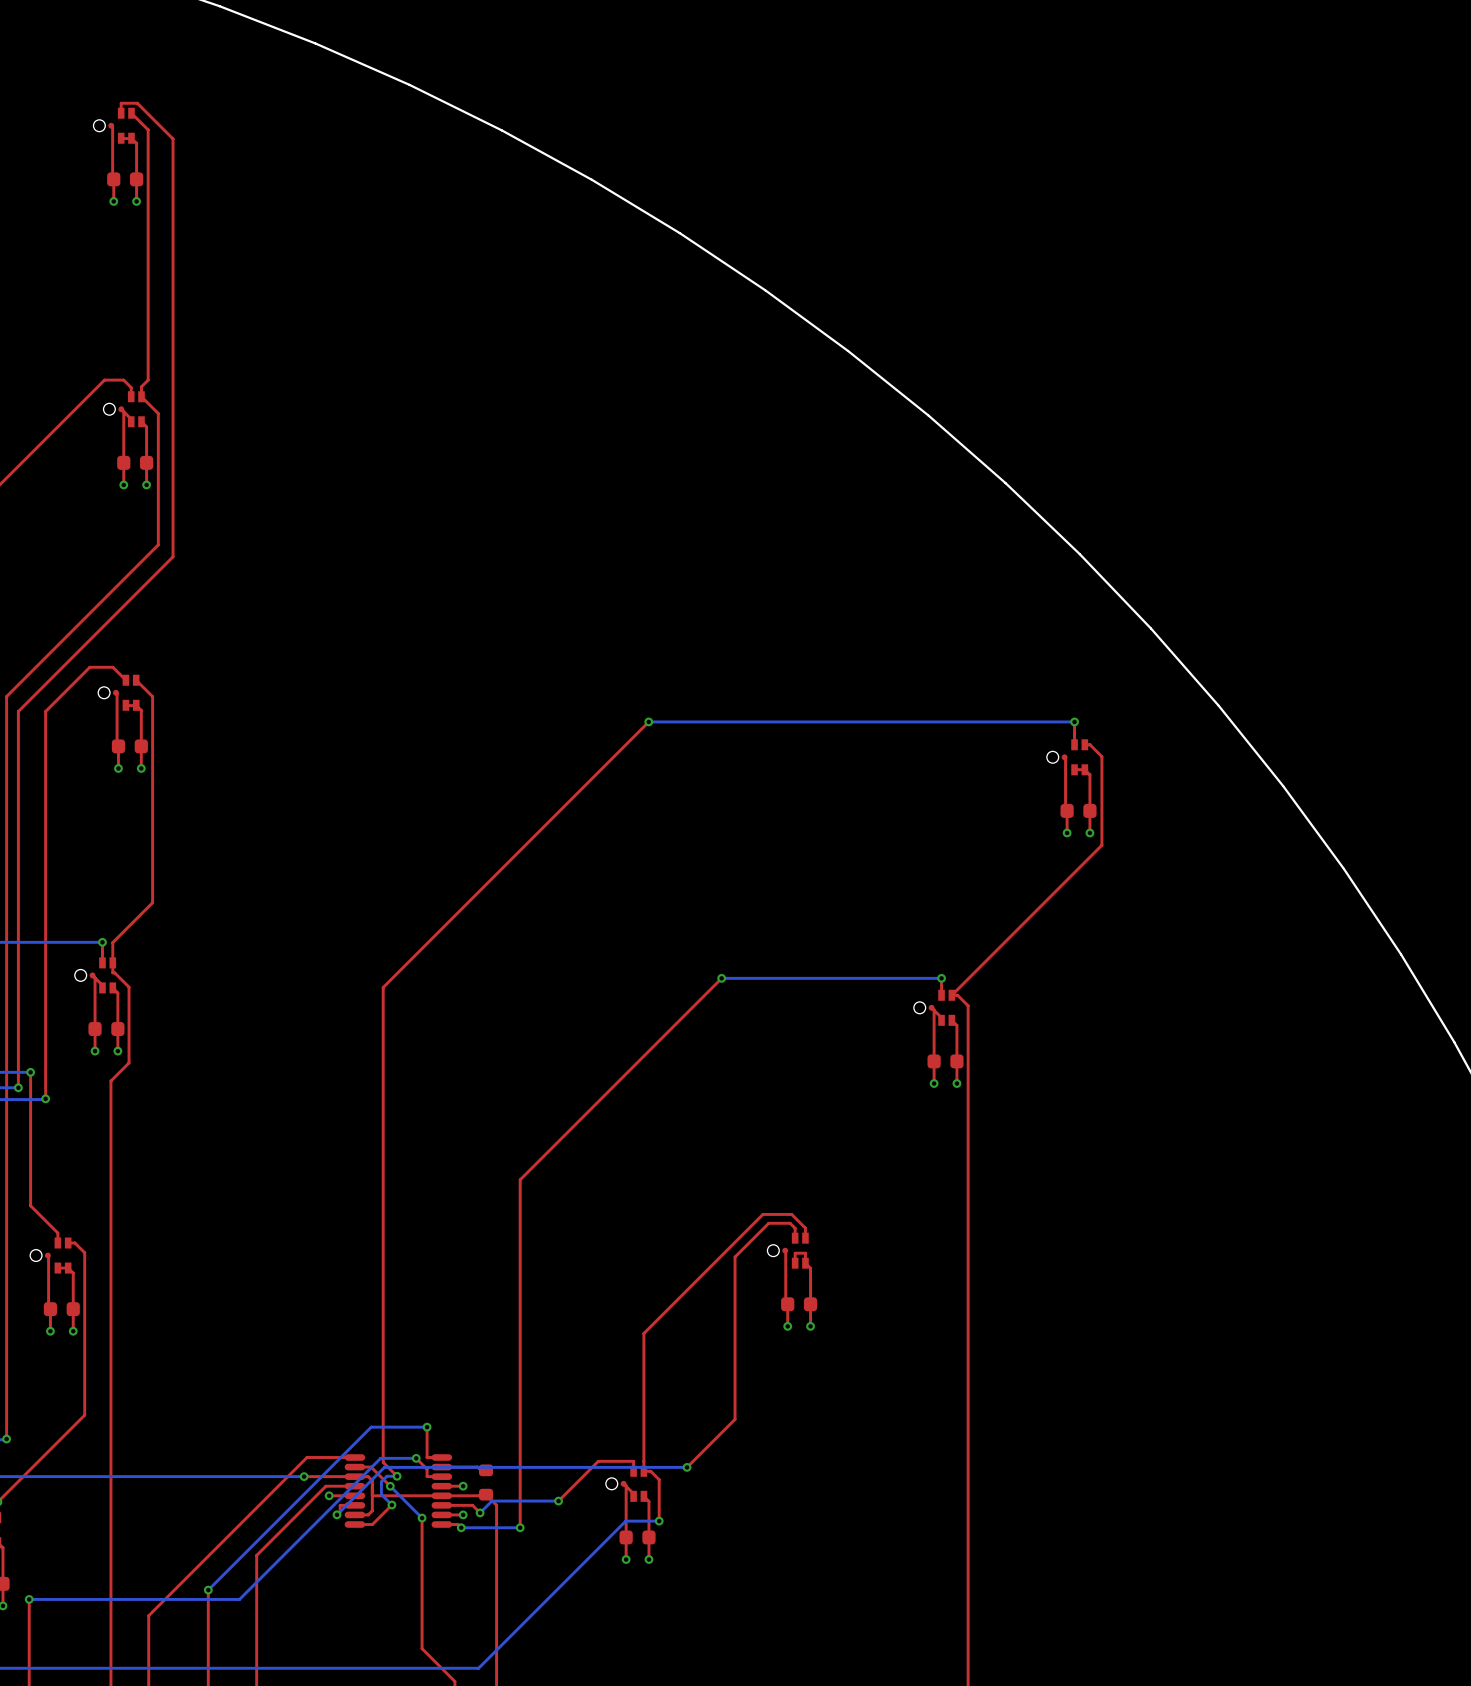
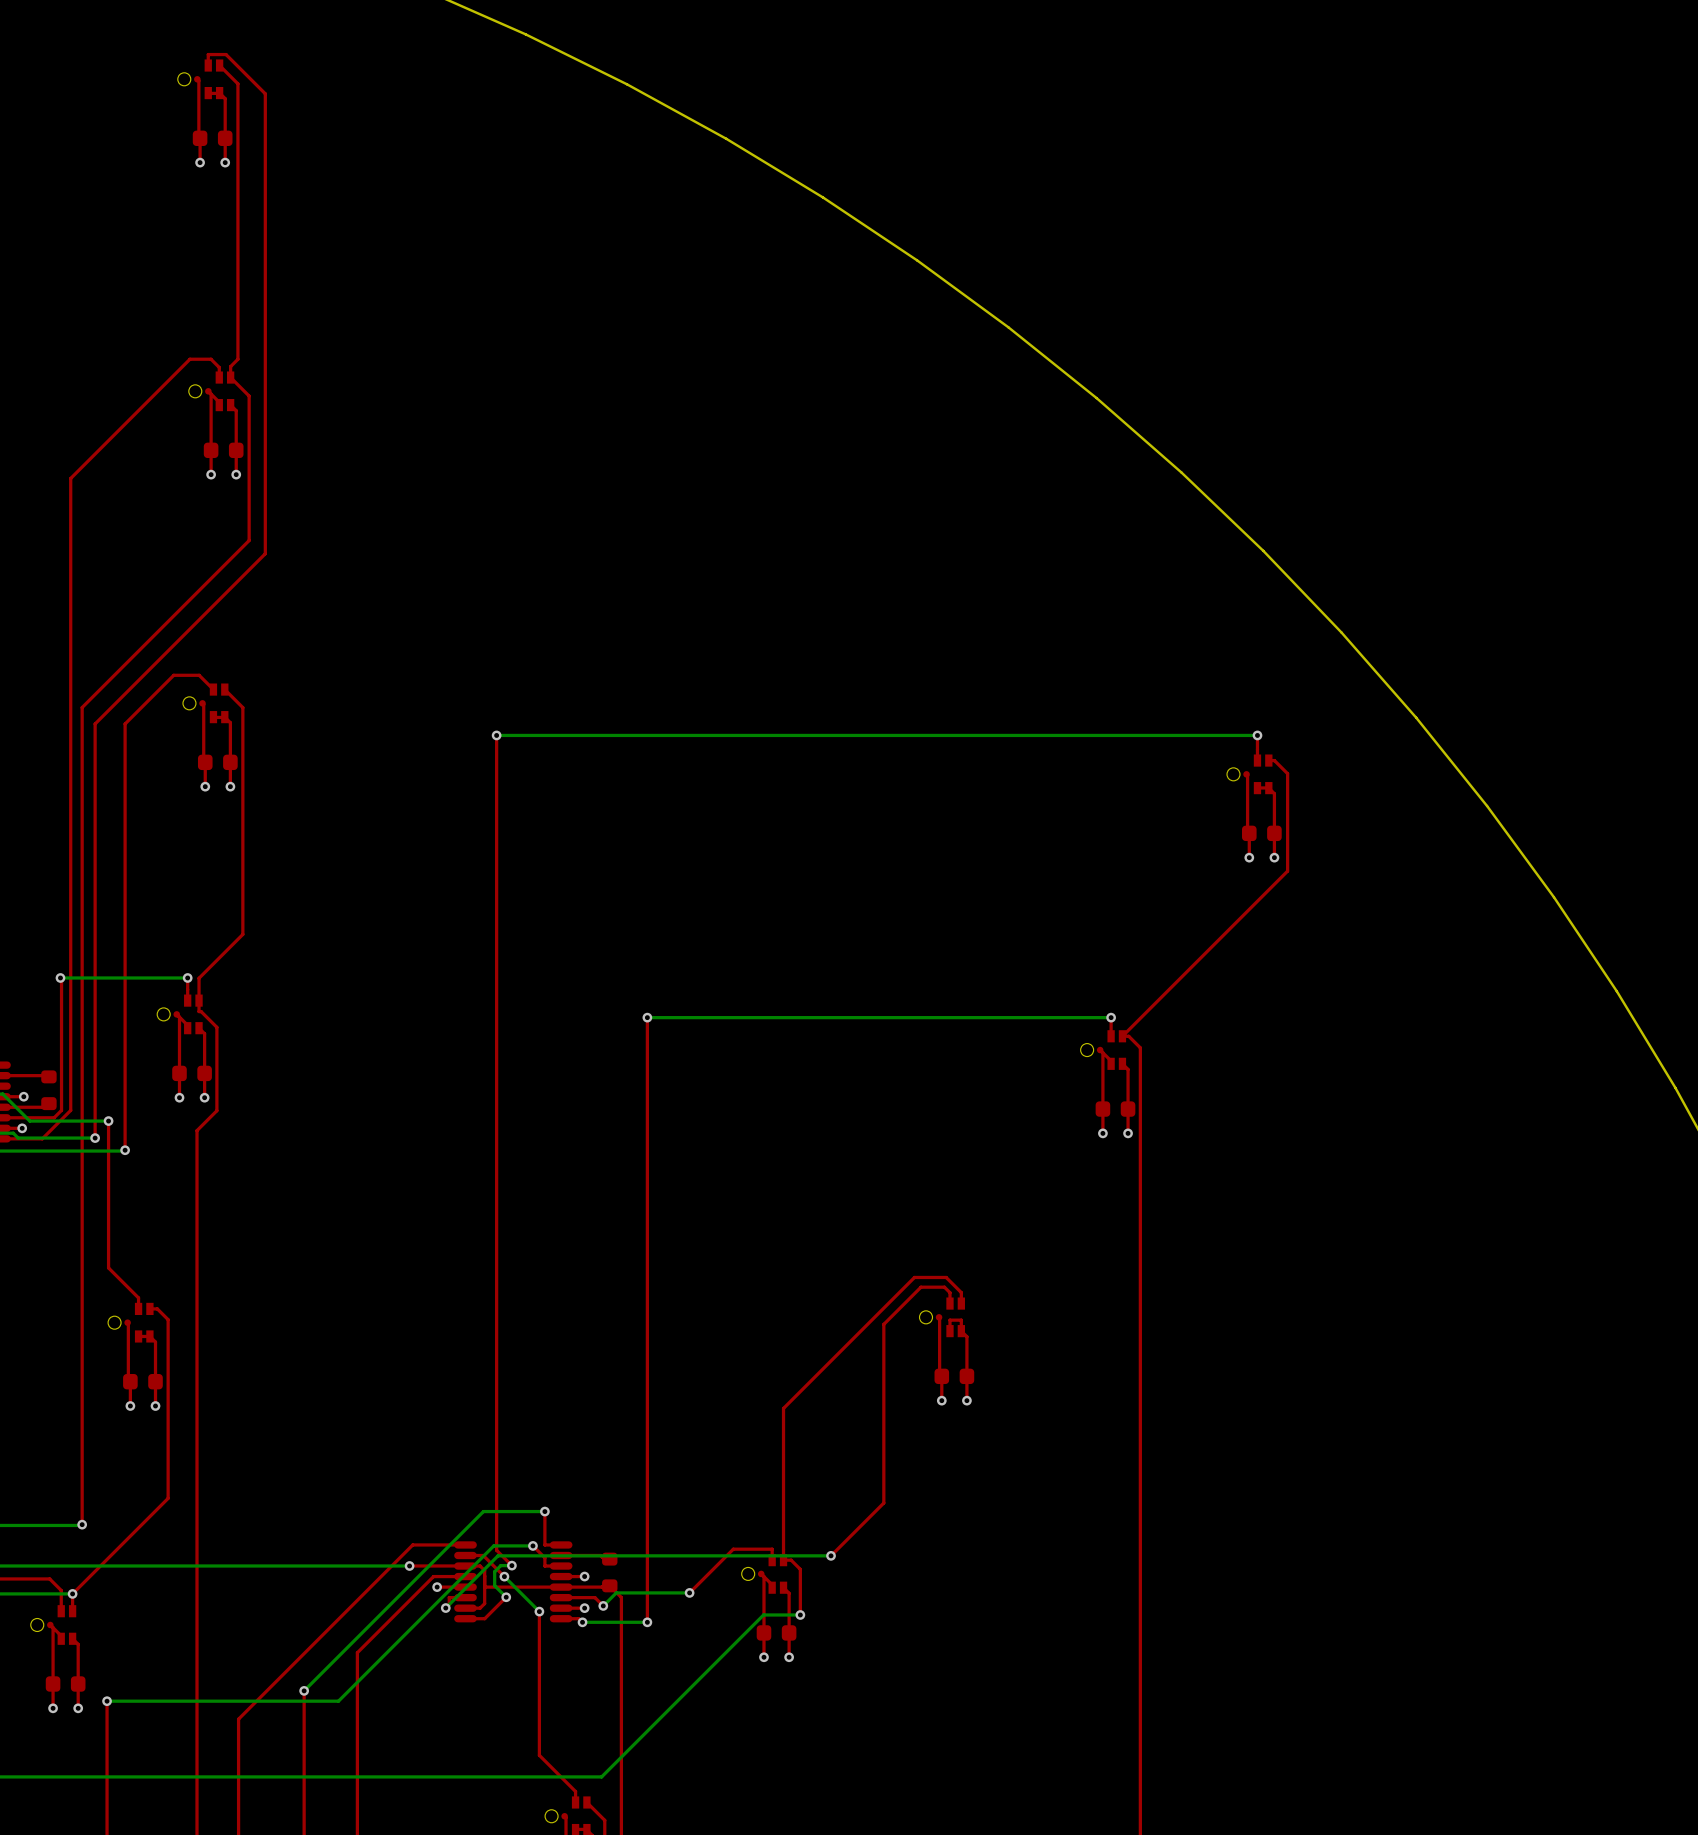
via: none -> (496, 735)
top track: (648, 721) (383, 987) -> (496, 735) (496, 1027)
bottom track: none -> (788, 735) (496, 735)
via: (648, 721) -> none
via: none -> (647, 1017)
top track: (721, 978) (520, 1179) -> (647, 1017) (647, 1239)
bottom track: none -> (869, 1017) (647, 1017)
via: (721, 978) -> none

